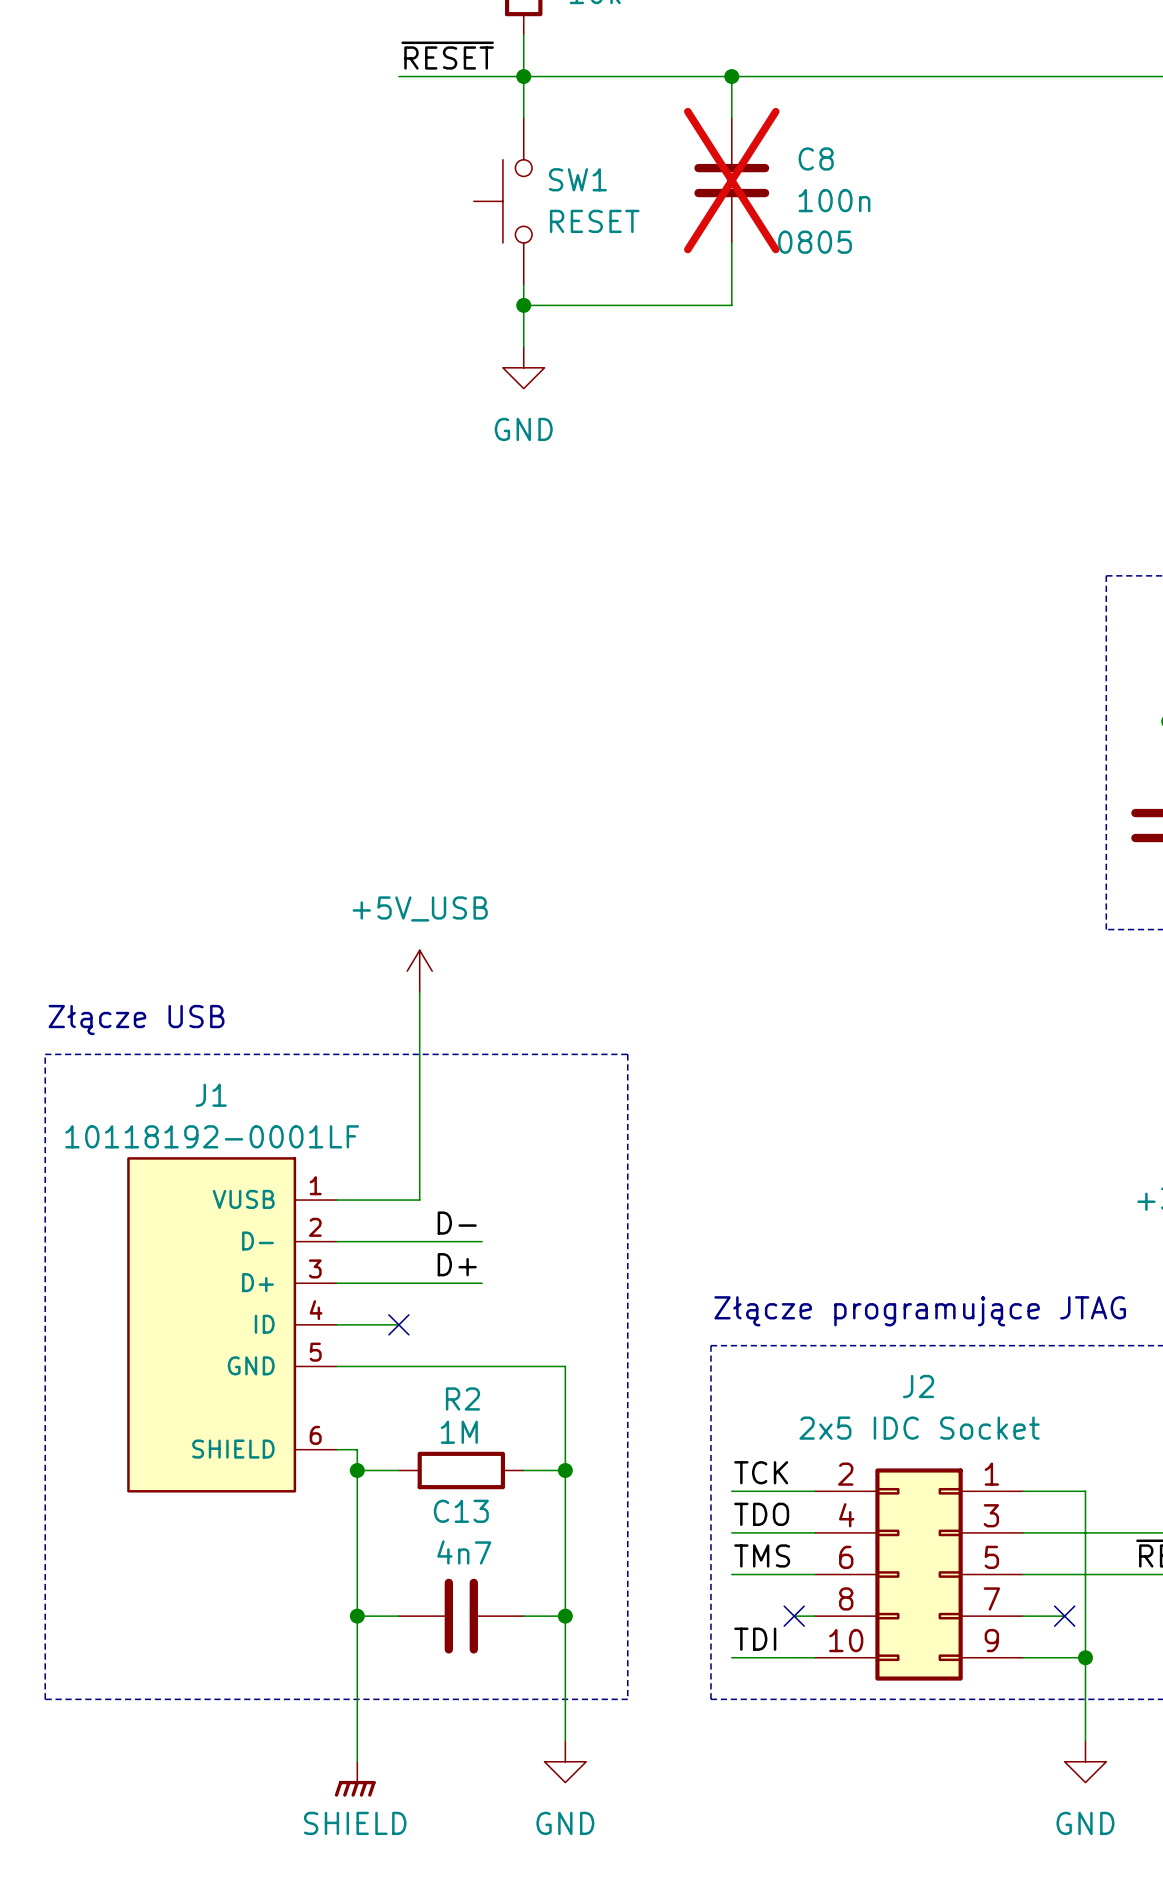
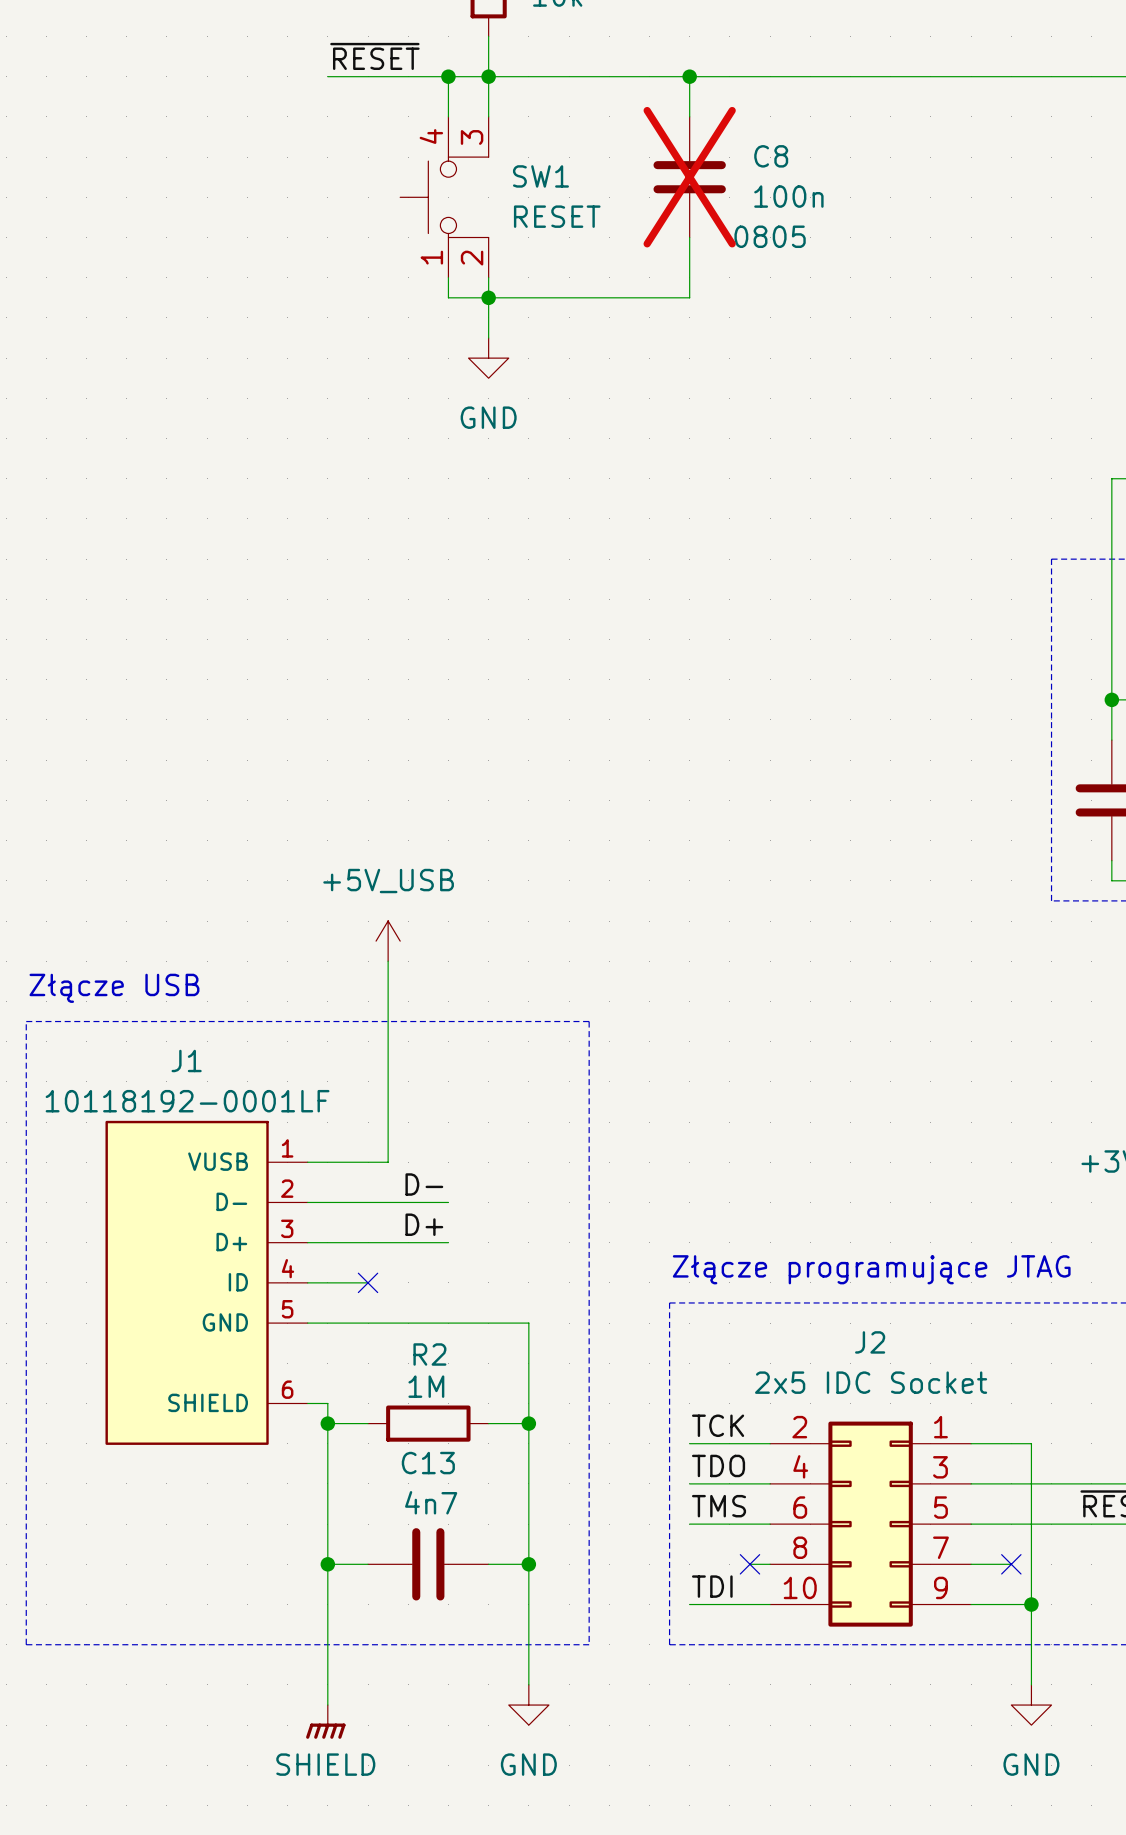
label position: ~{RESET} (447, 55) -> ~{RESET} (374, 56)
wire: none -> (327, 76) (368, 76)
wire: none -> (448, 76) (448, 116)
junction: none -> (448, 76)
SW1 symbol: [473, 118, 533, 285] -> [400, 116, 489, 278]
wire: none -> (448, 277) (448, 297) (488, 297)

